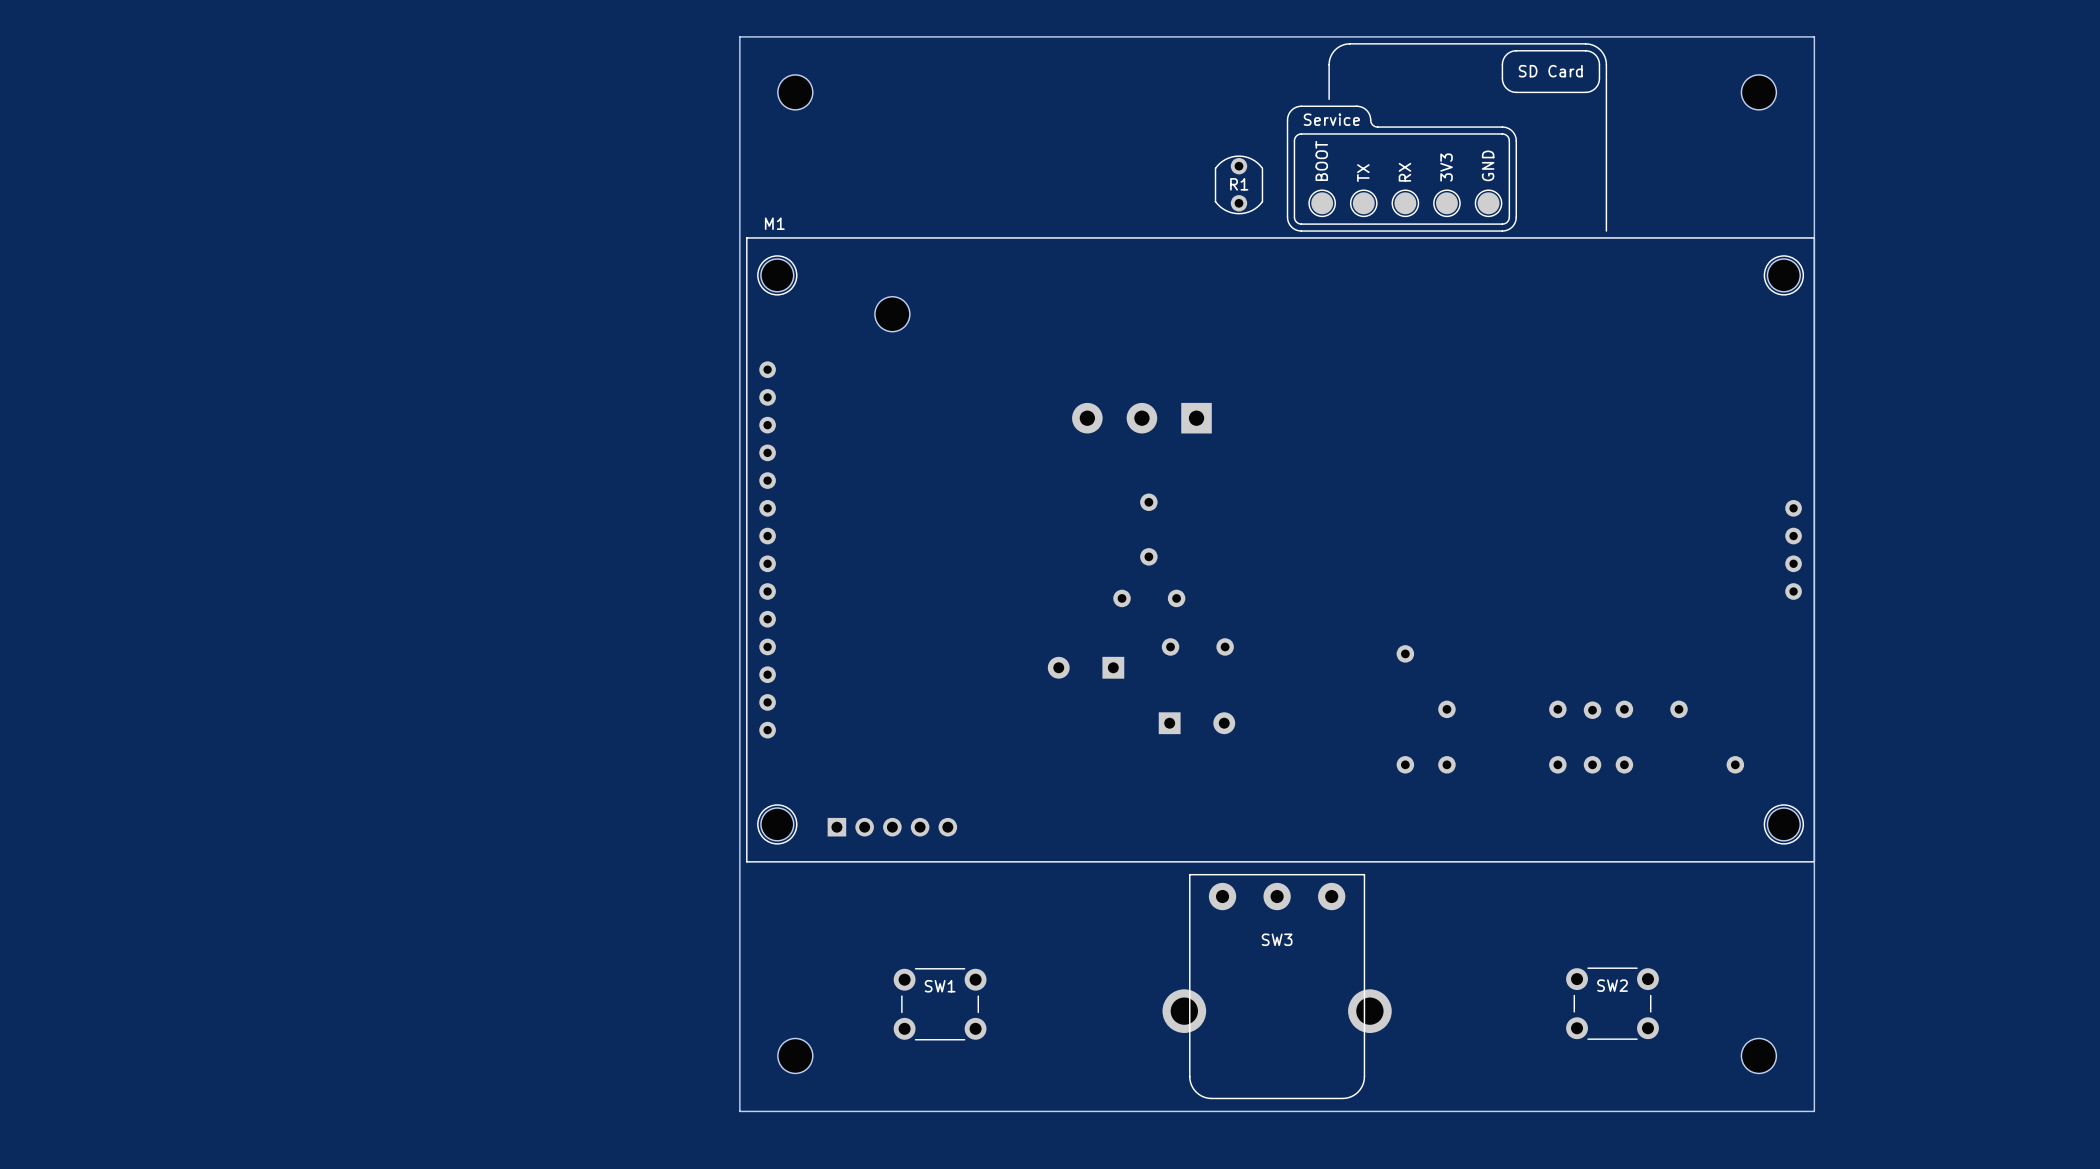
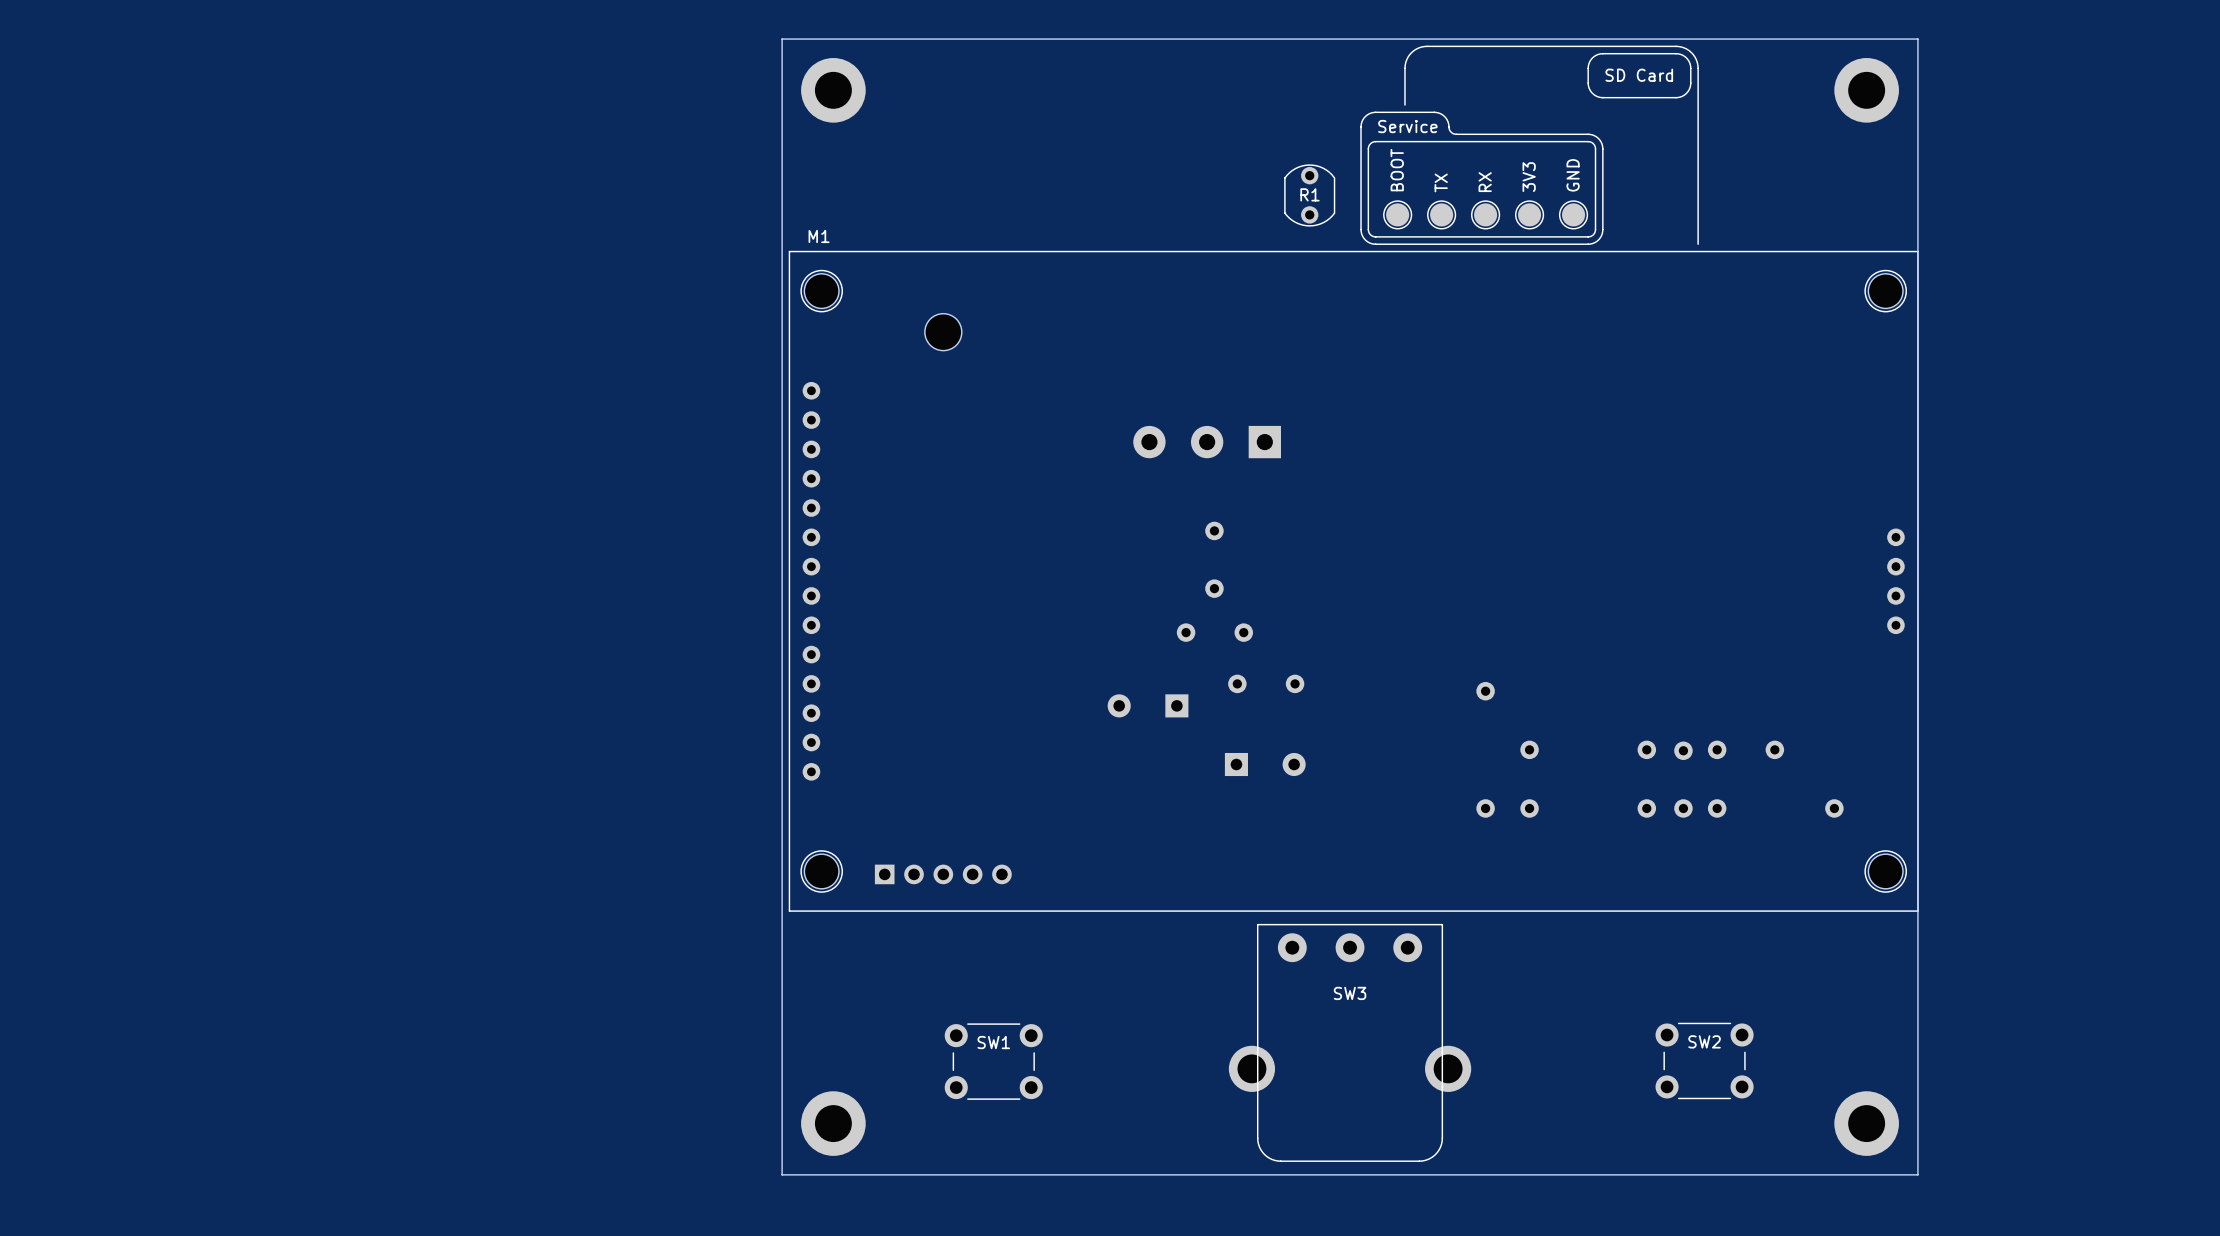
part footprint: [777, 74, 813, 110] -> [801, 58, 866, 123]
part footprint: [1741, 74, 1777, 110] -> [1834, 58, 1899, 123]
part footprint: [777, 1038, 813, 1074] -> [801, 1091, 866, 1156]
part footprint: [1741, 1038, 1777, 1074] -> [1834, 1091, 1899, 1156]

